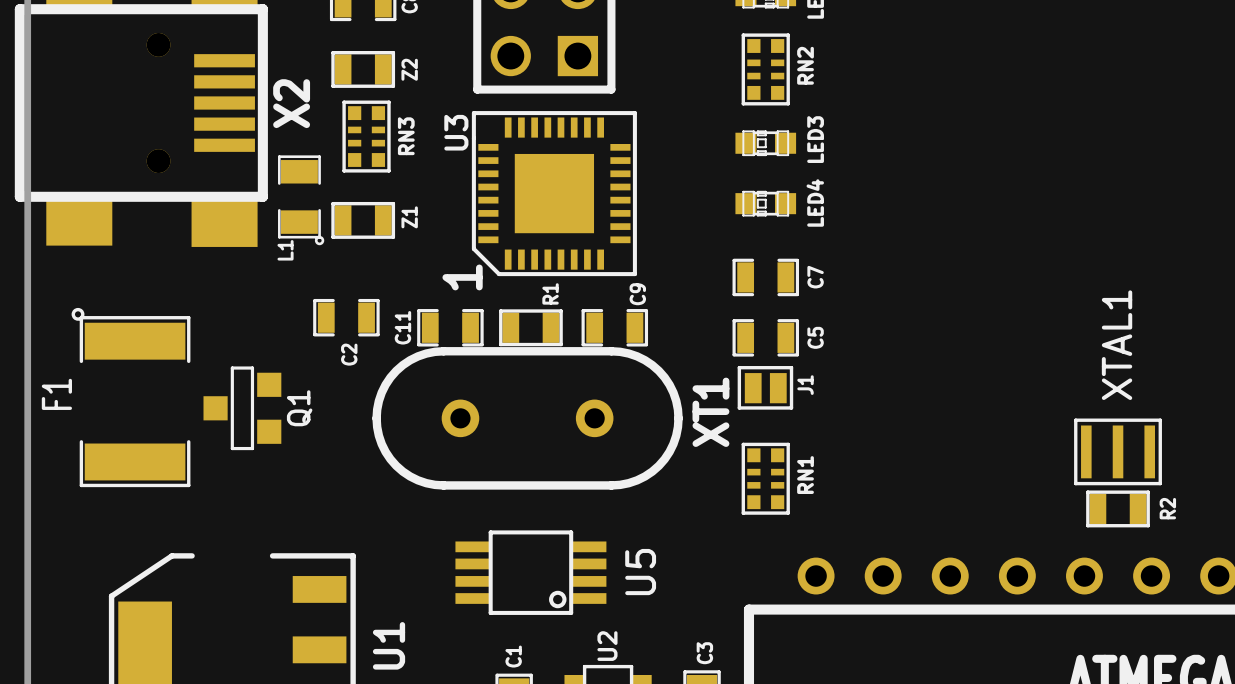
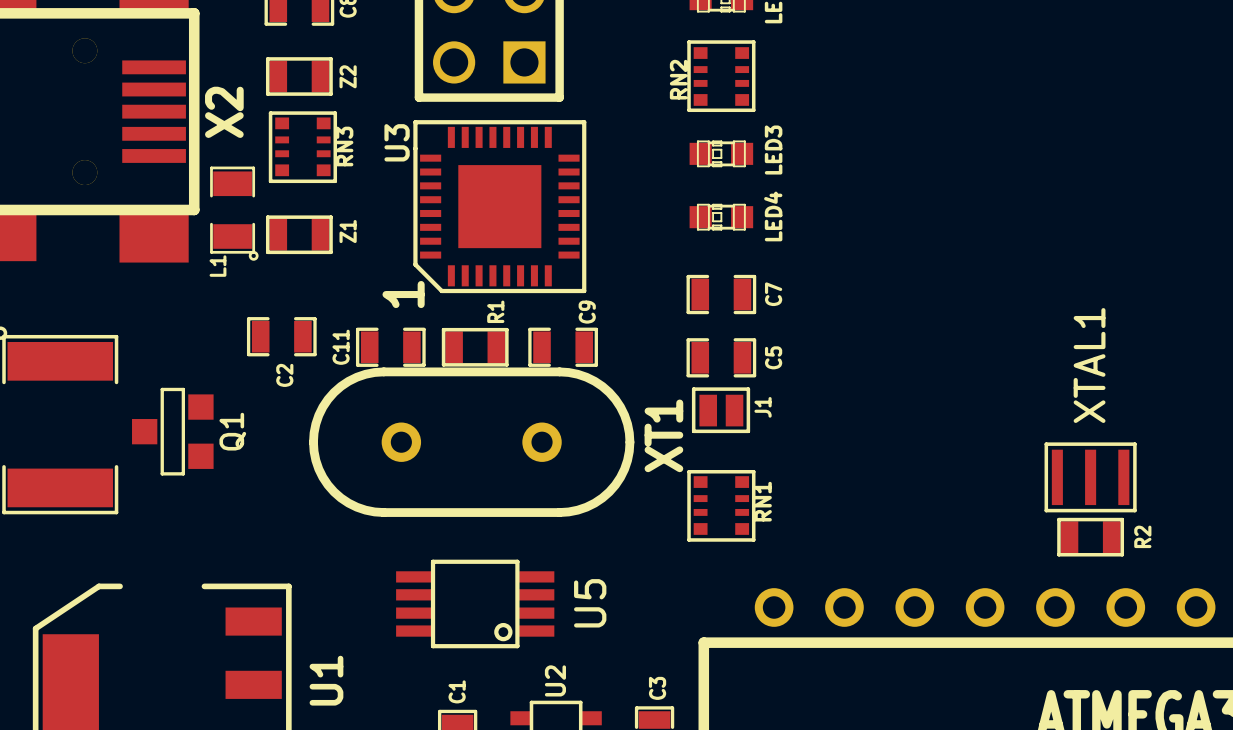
RN2 footprint: [741, 33, 790, 106] -> [687, 40, 756, 113]
RN2 name position: RN2 (805, 65) -> RN2 (678, 79)
RN3 footprint: [342, 100, 391, 173] -> [268, 111, 338, 184]
RN1 footprint: [741, 442, 790, 515] -> [687, 470, 756, 542]

